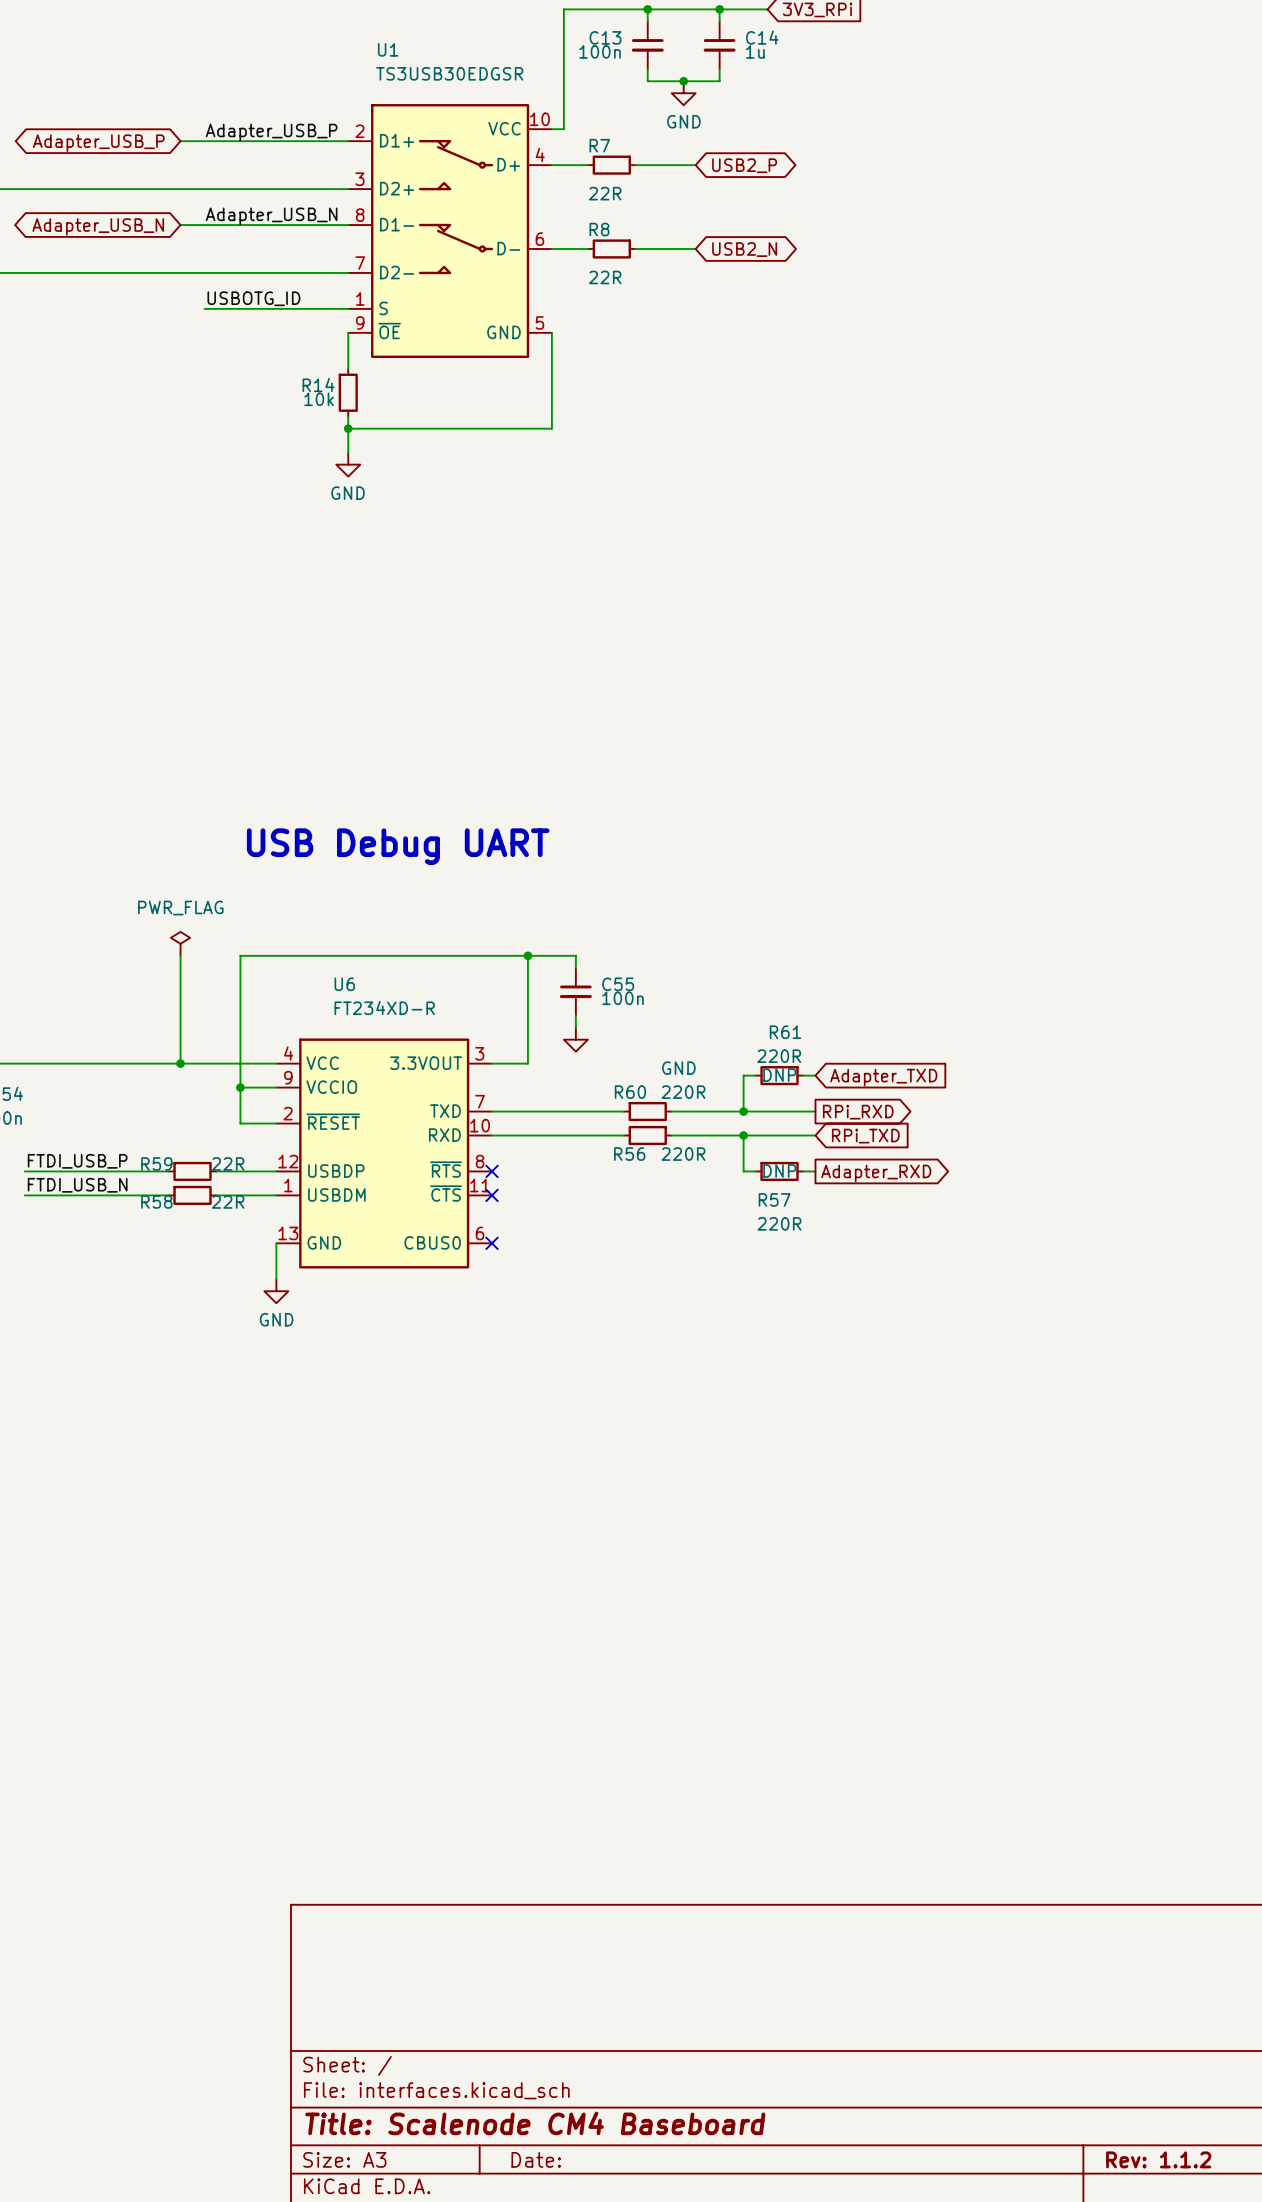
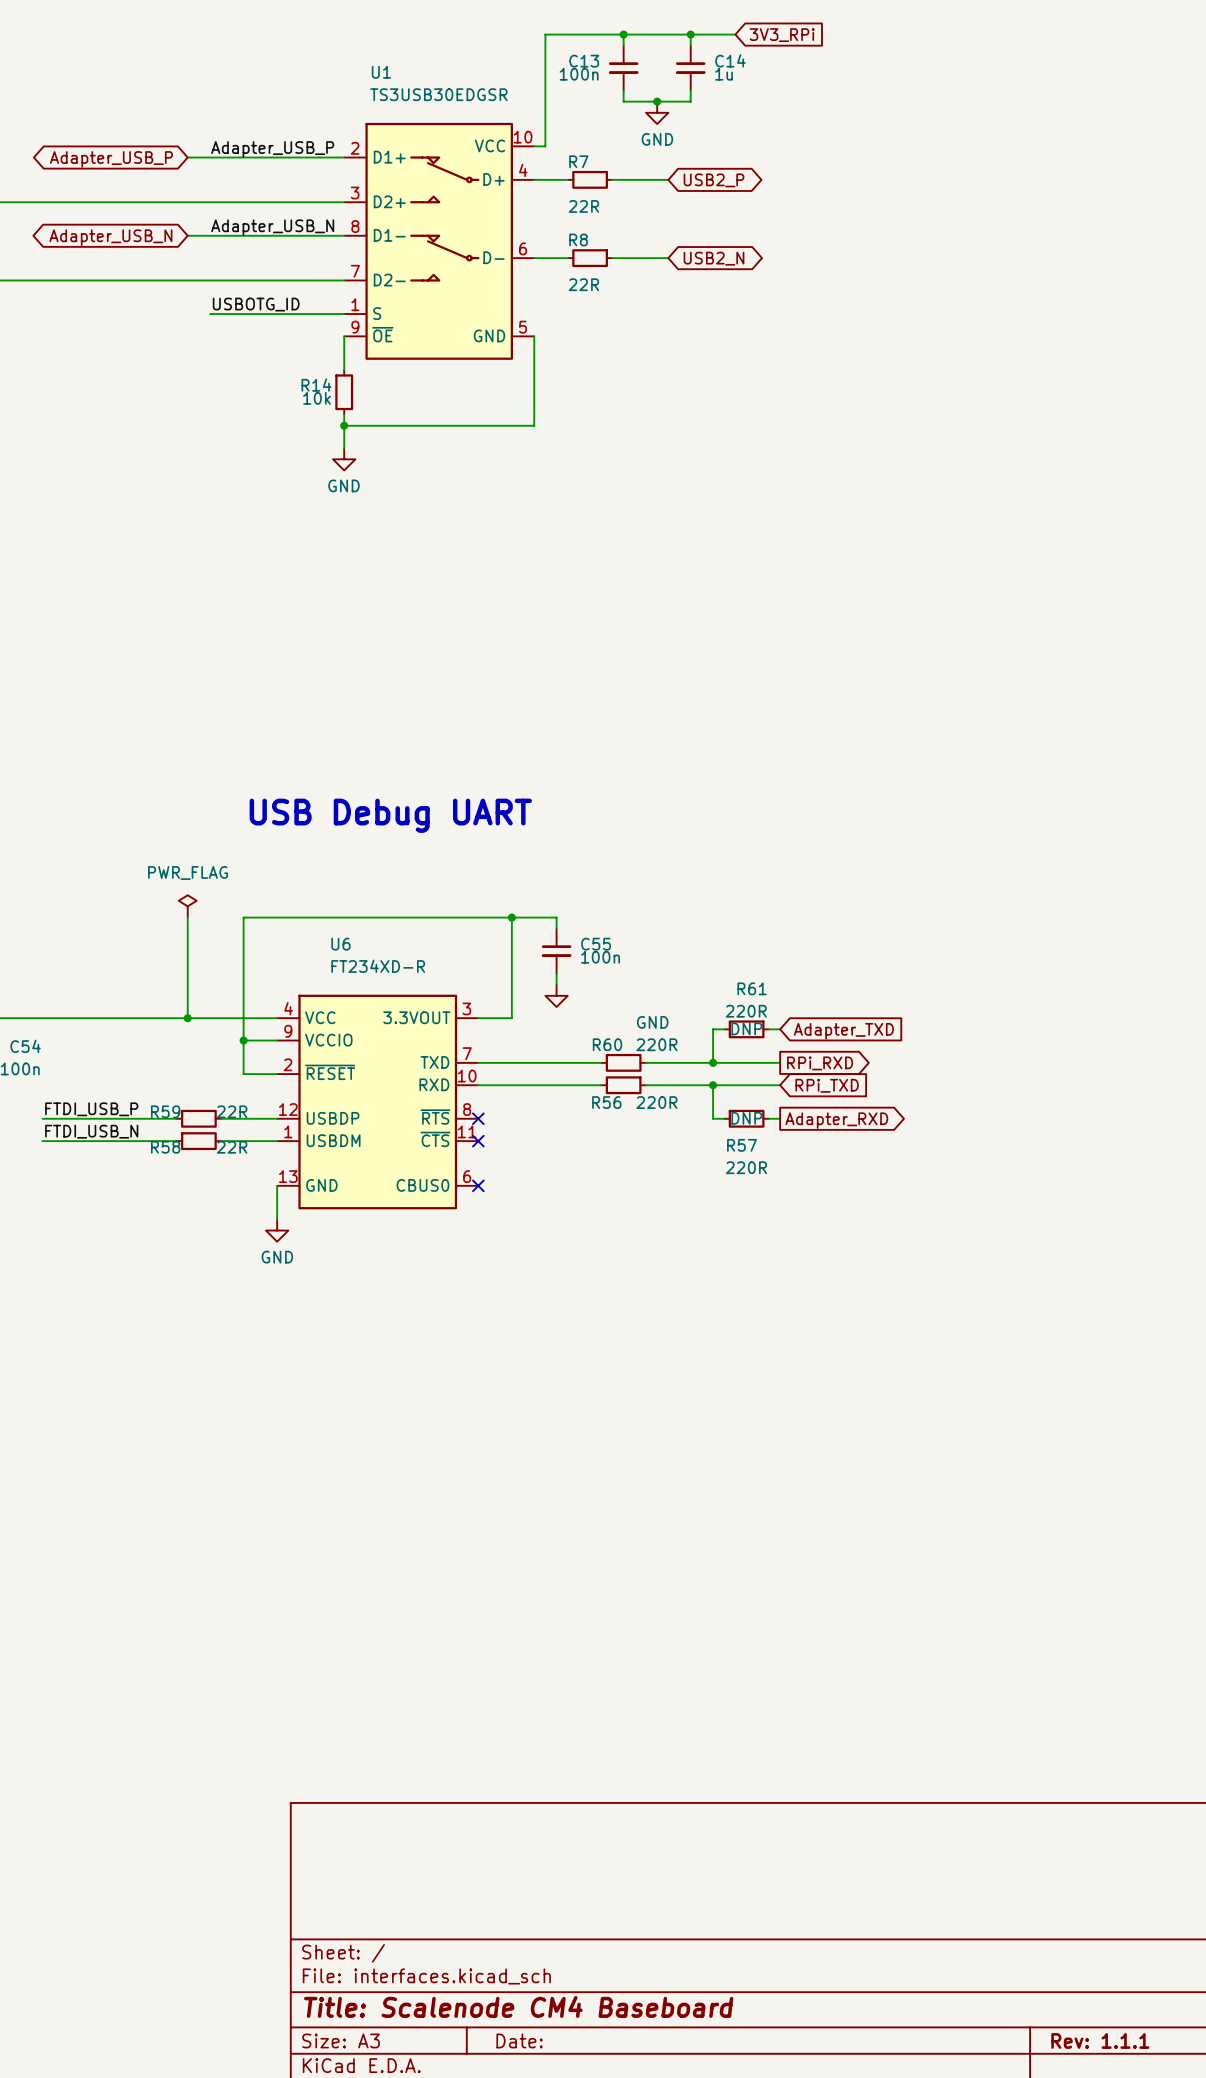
title block: Rev: 1.1.2 (1158, 2159) -> Rev: 1.1.1 (1100, 2040)

